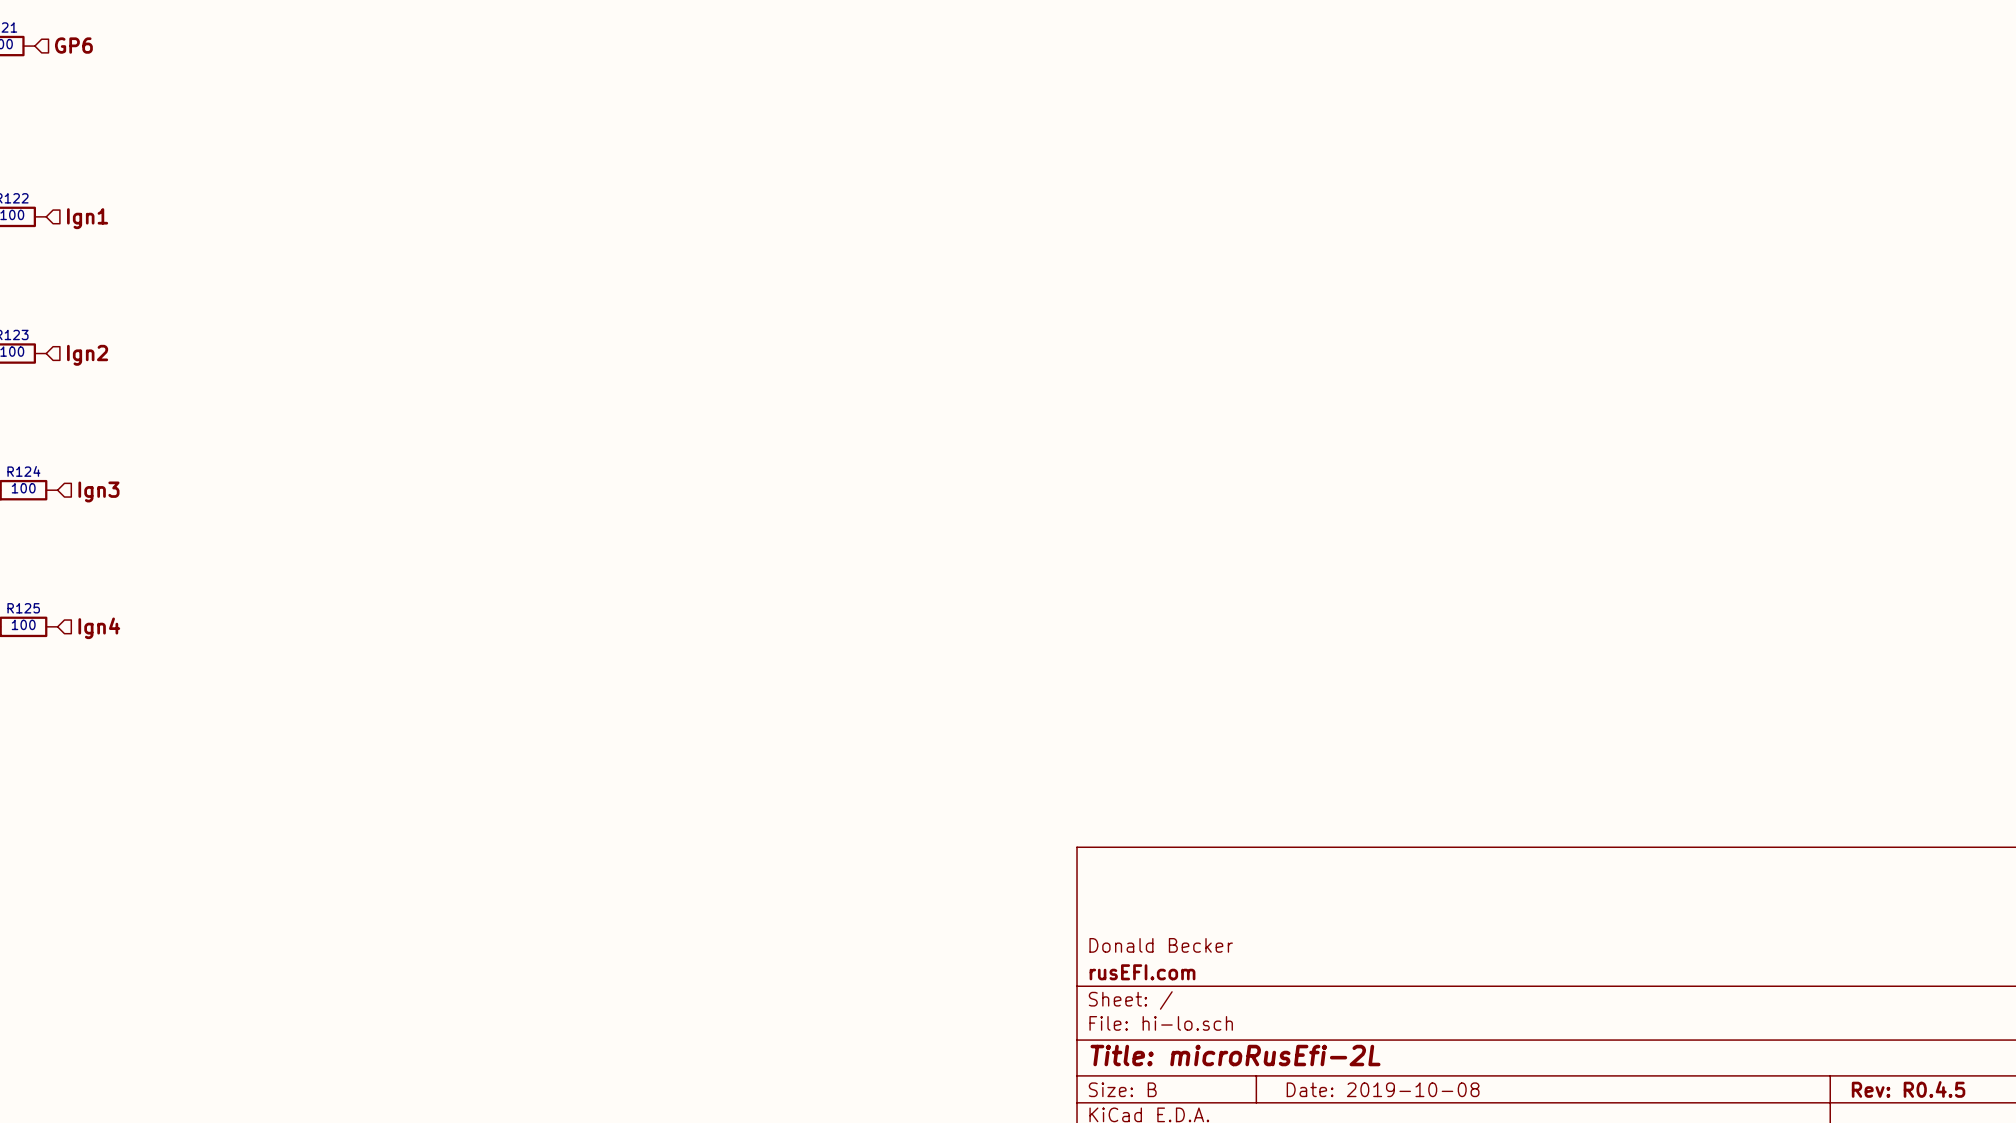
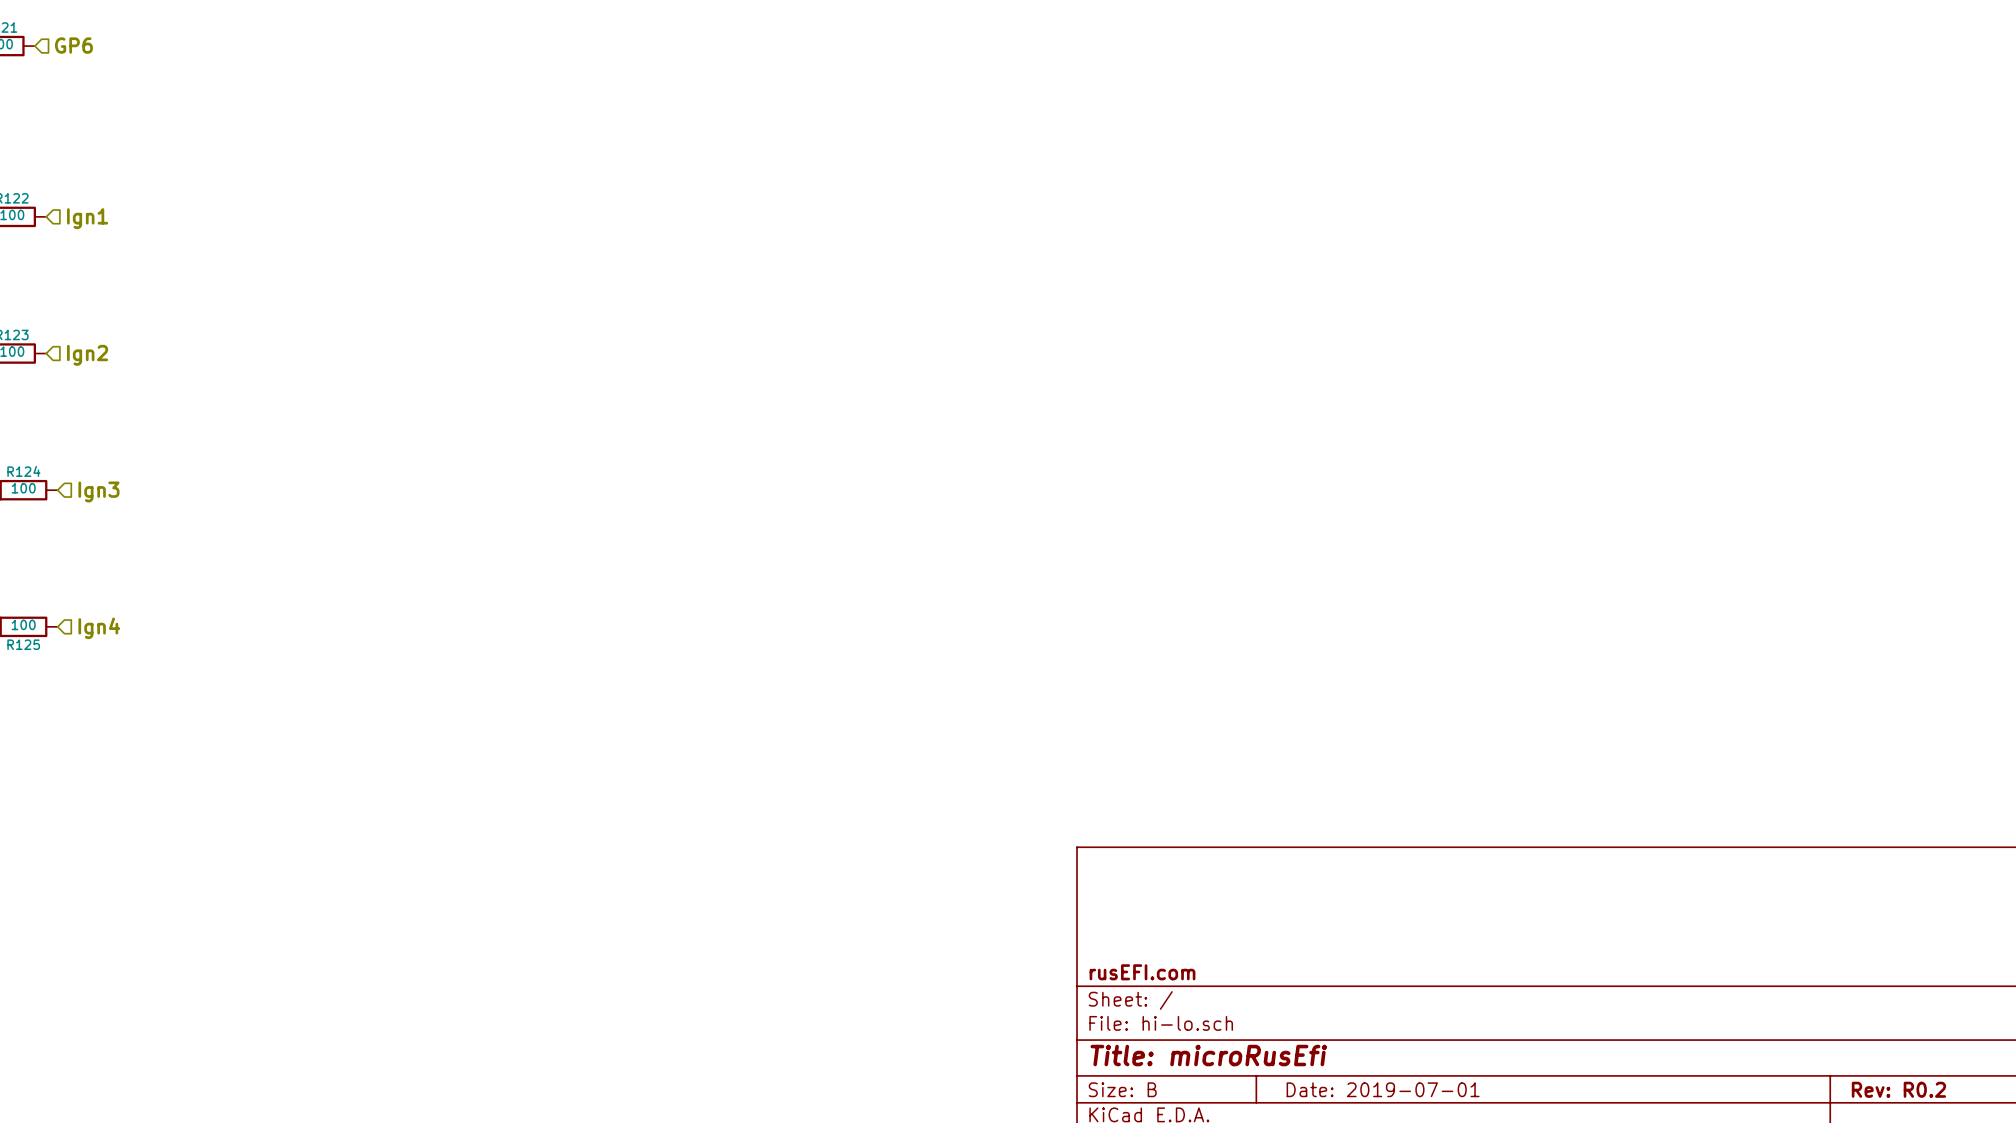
R125 name position: R125 (23, 608) -> R125 (23, 644)
title block: Donald Becker (1161, 945) -> none
title block: Title: microRusEfi-2L (1235, 1055) -> Title: microRusEfi (1208, 1055)
title block: Date: 2019-10-08 (1383, 1089) -> Date: 2019-07-01 (1383, 1089)
title block: Rev: R0.4.5 (1908, 1089) -> Rev: R0.2 (1898, 1089)

